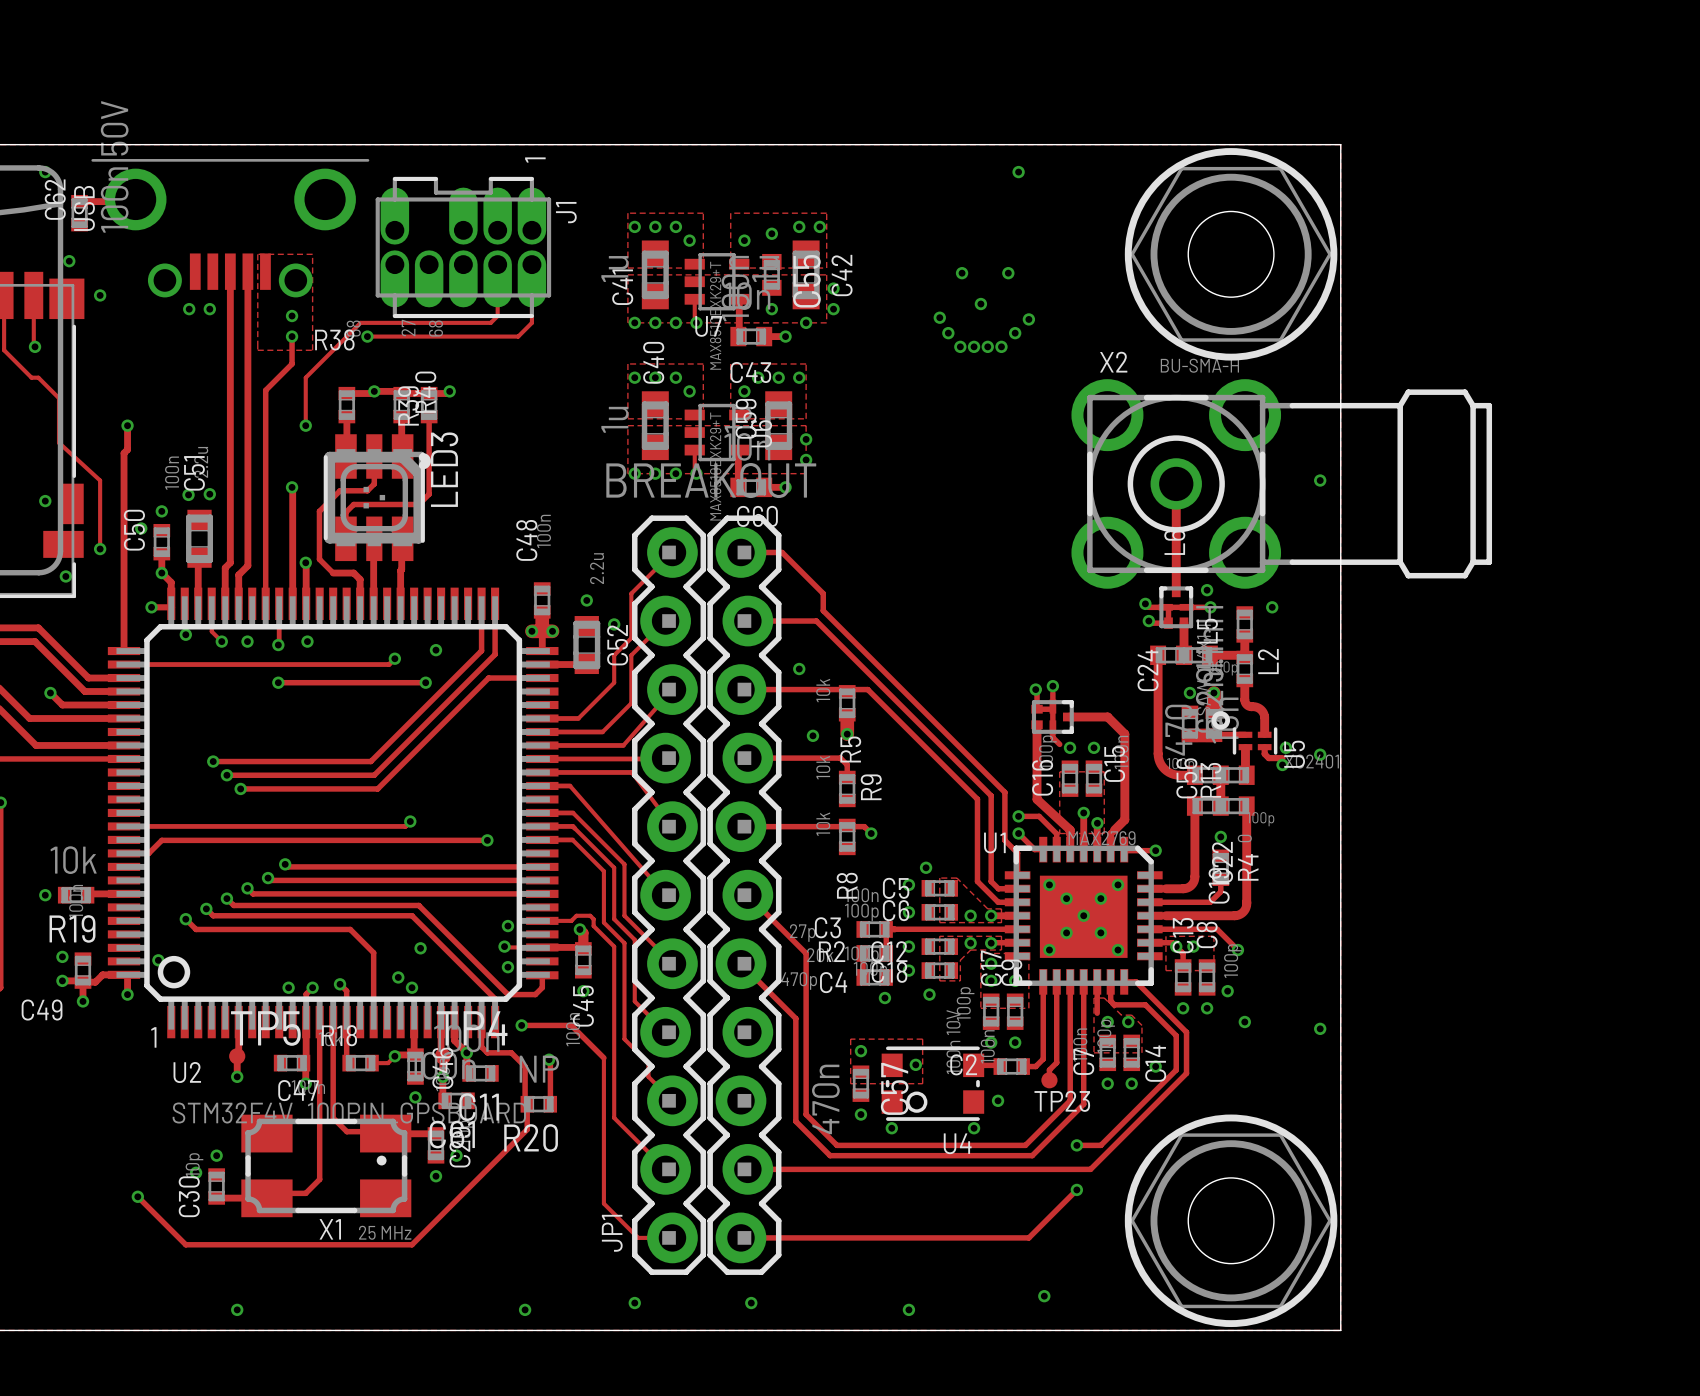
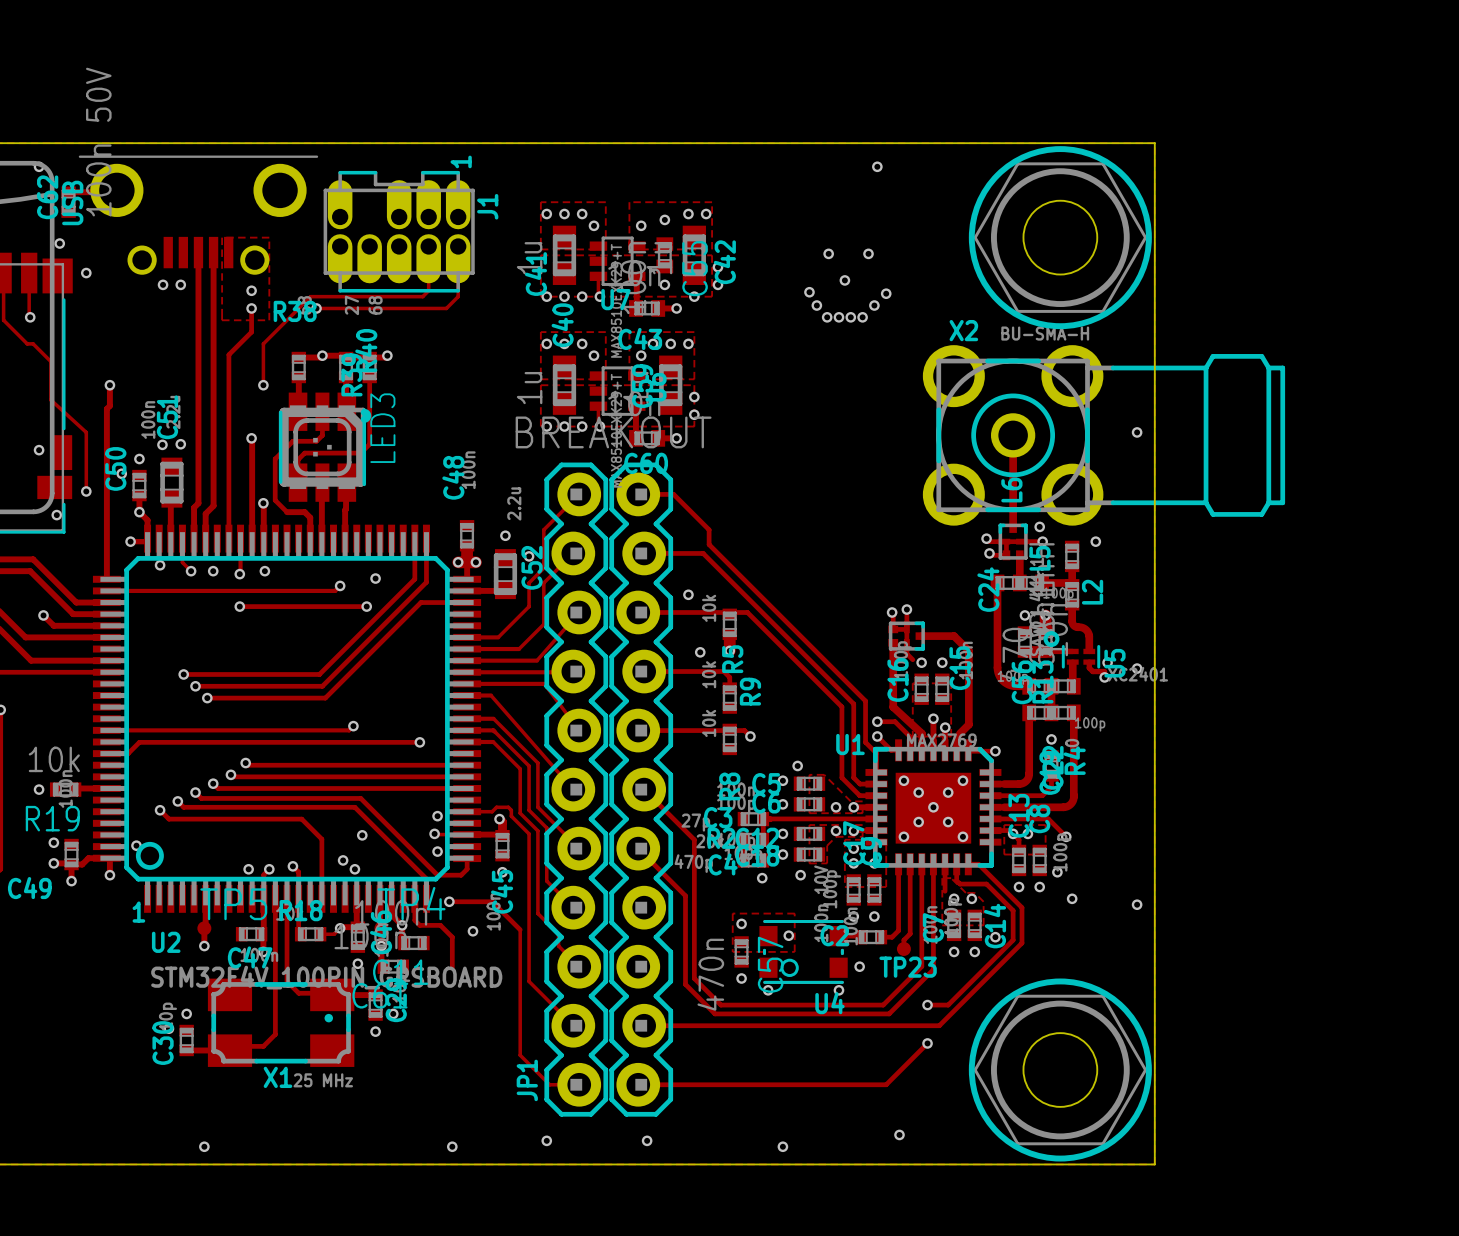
track: (550, 1061) (550, 1104) -> none
track: (525, 1102) (527, 1104) (527, 1129) (412, 1244) (185, 1244) (137, 1196) -> none
R20: NP (538, 1104) -> none
via: (137, 1196) -> none

